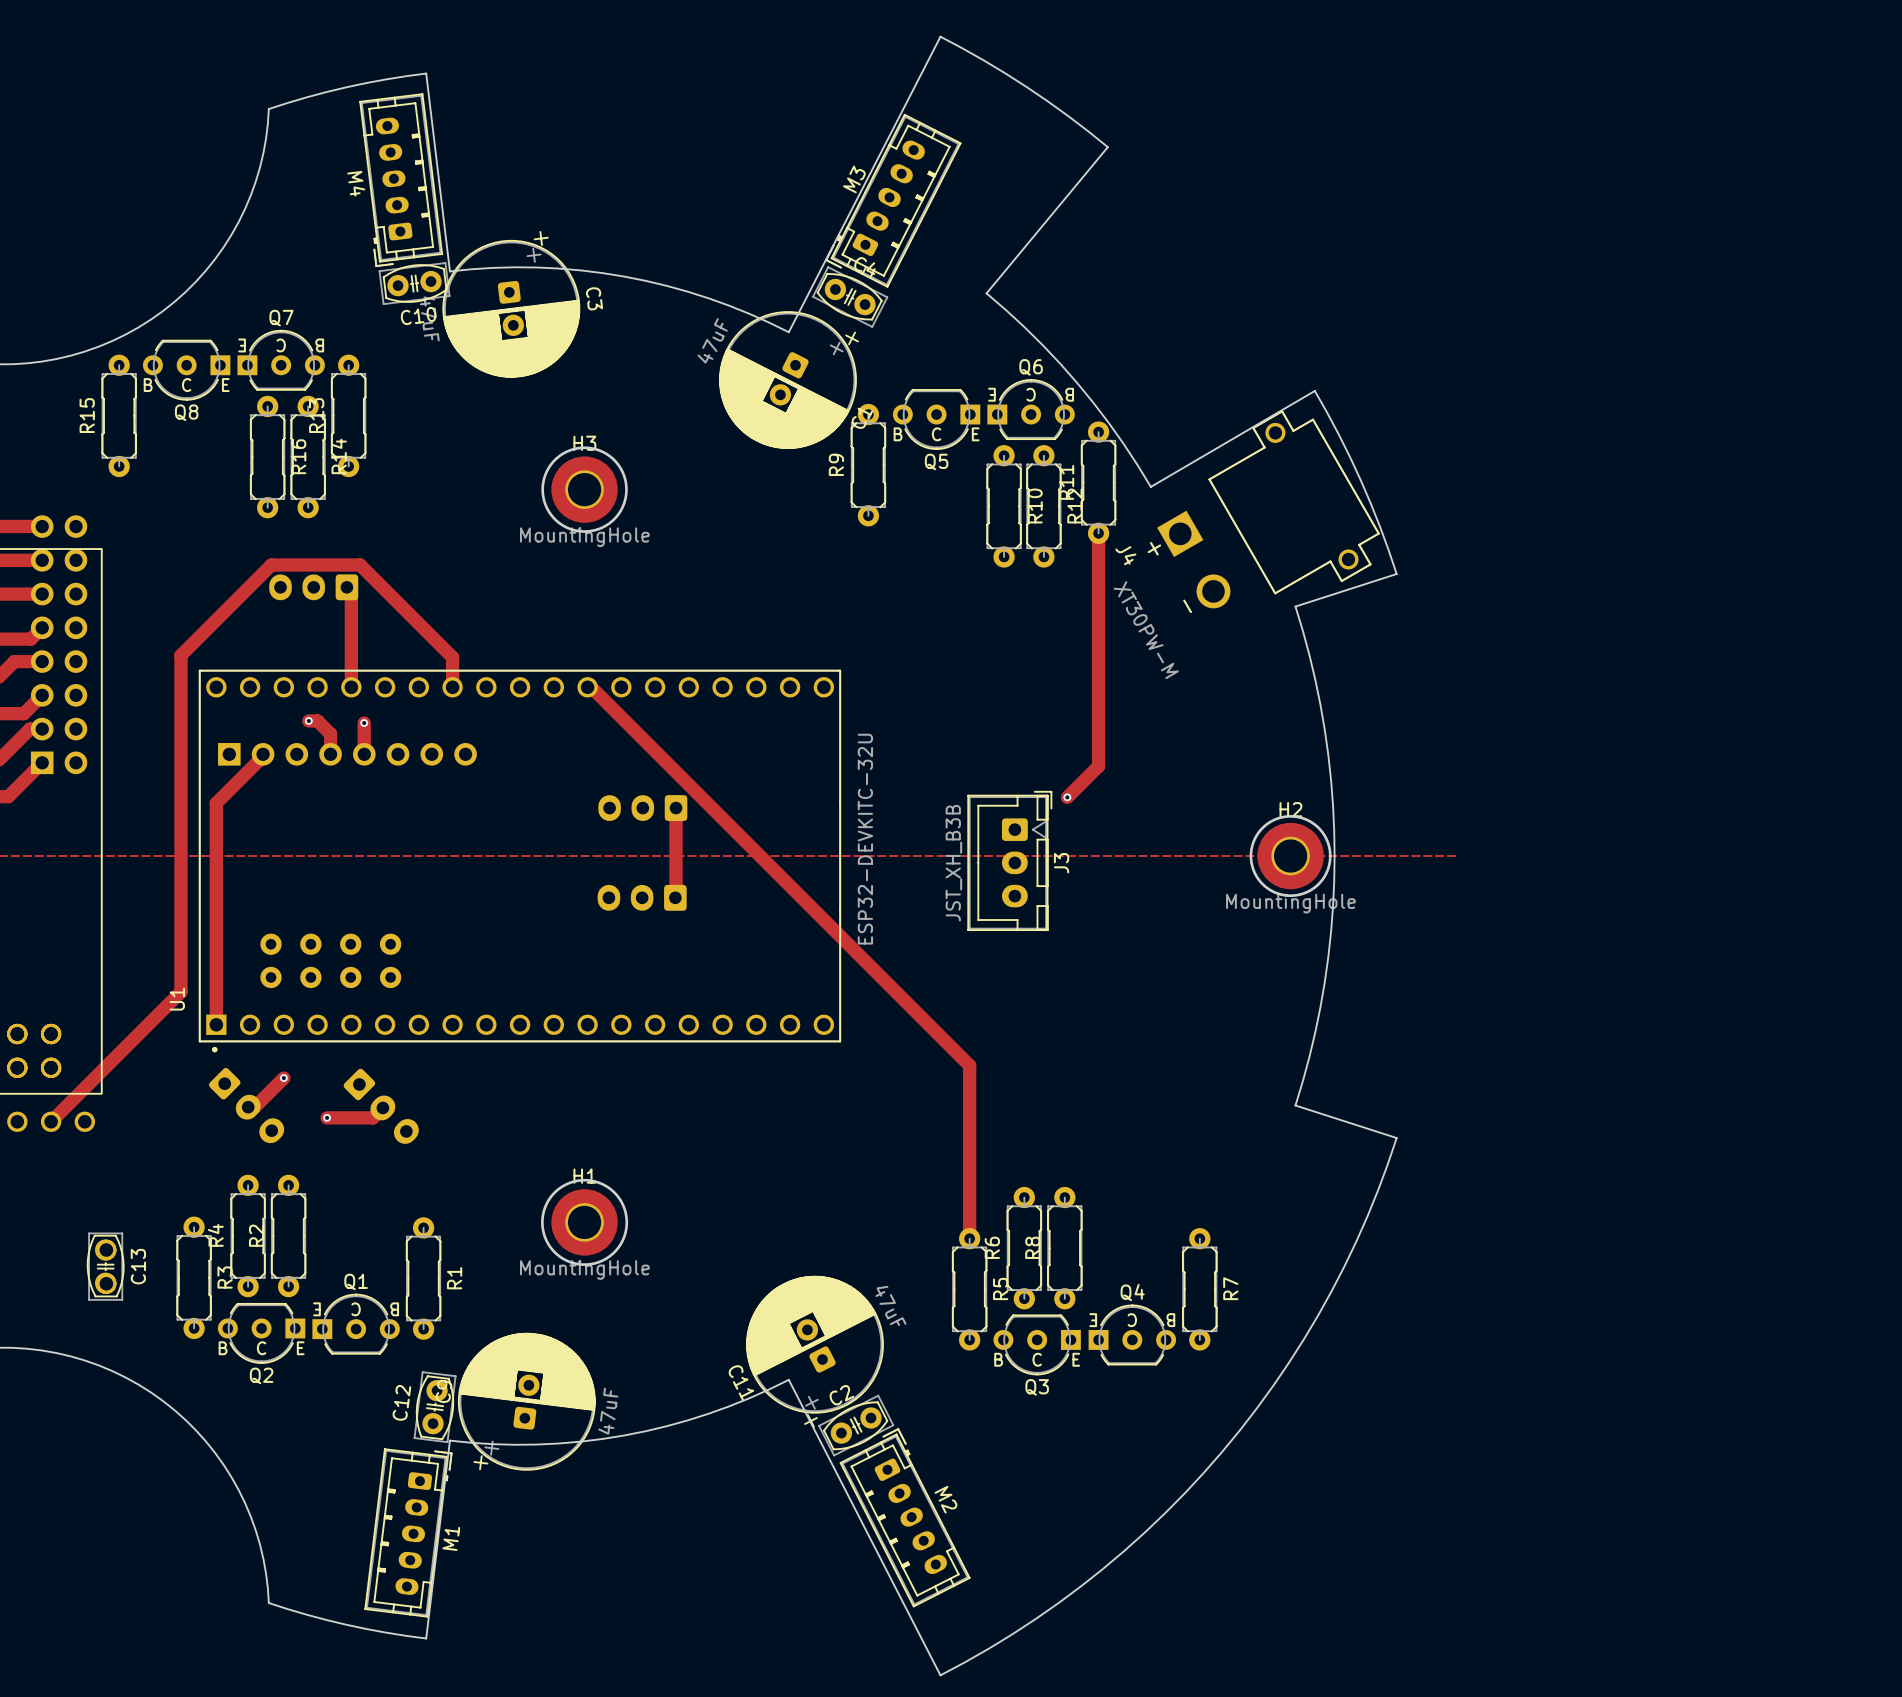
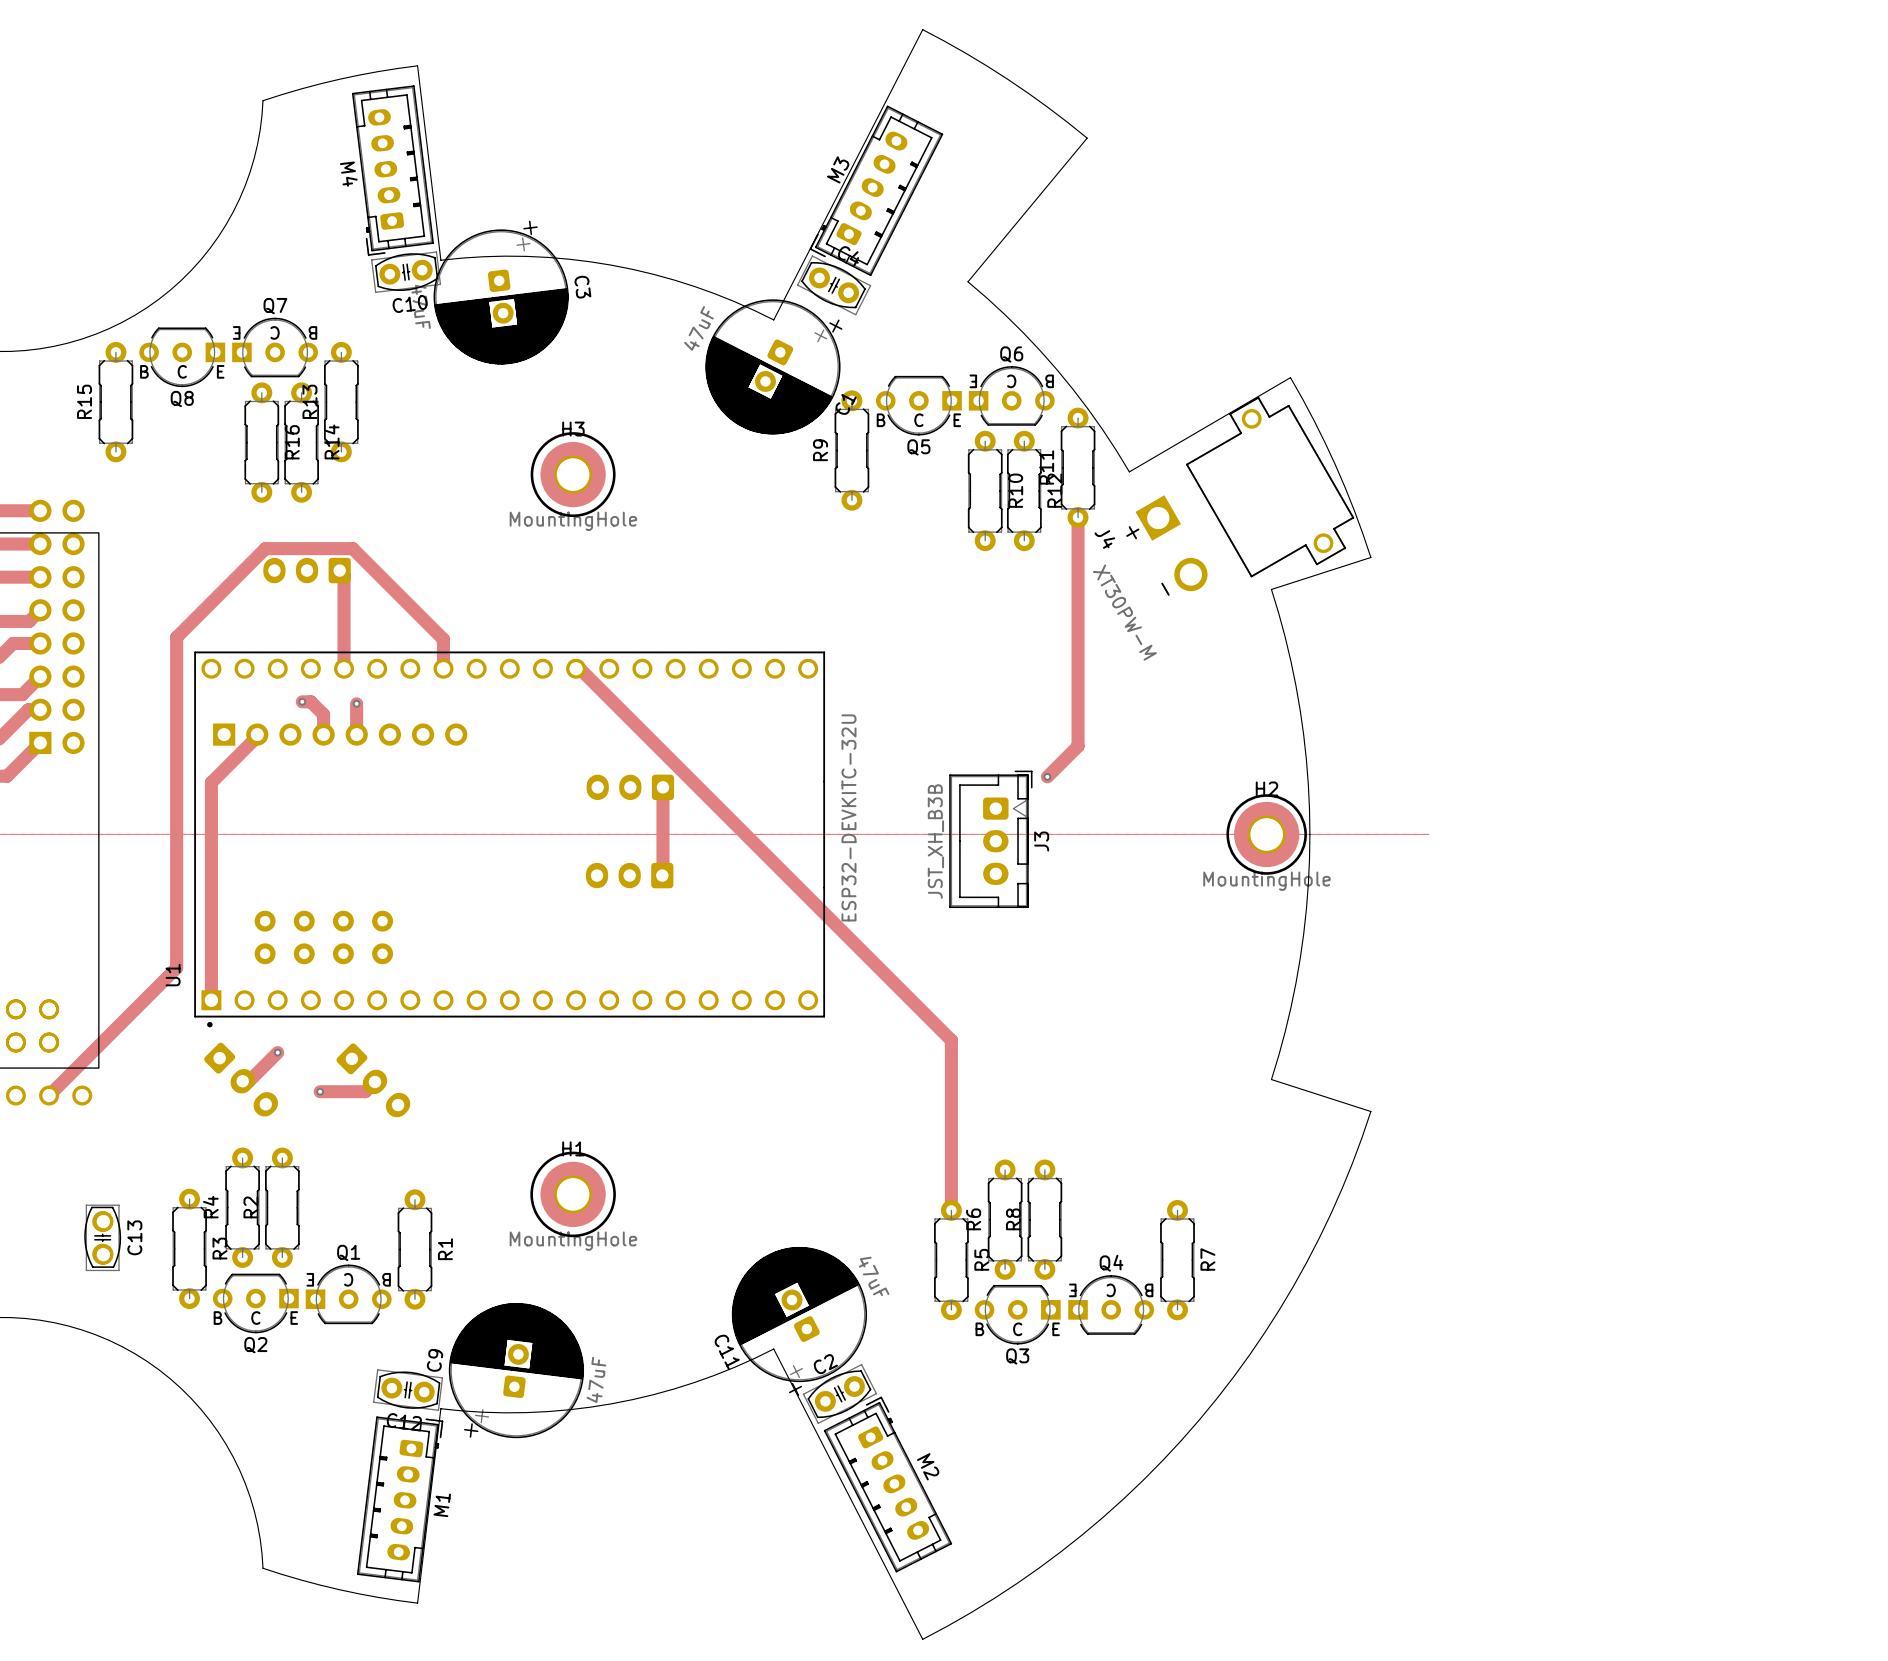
C12 rotation: 0° (435, 1407) -> 90° counterclockwise (408, 1390)

